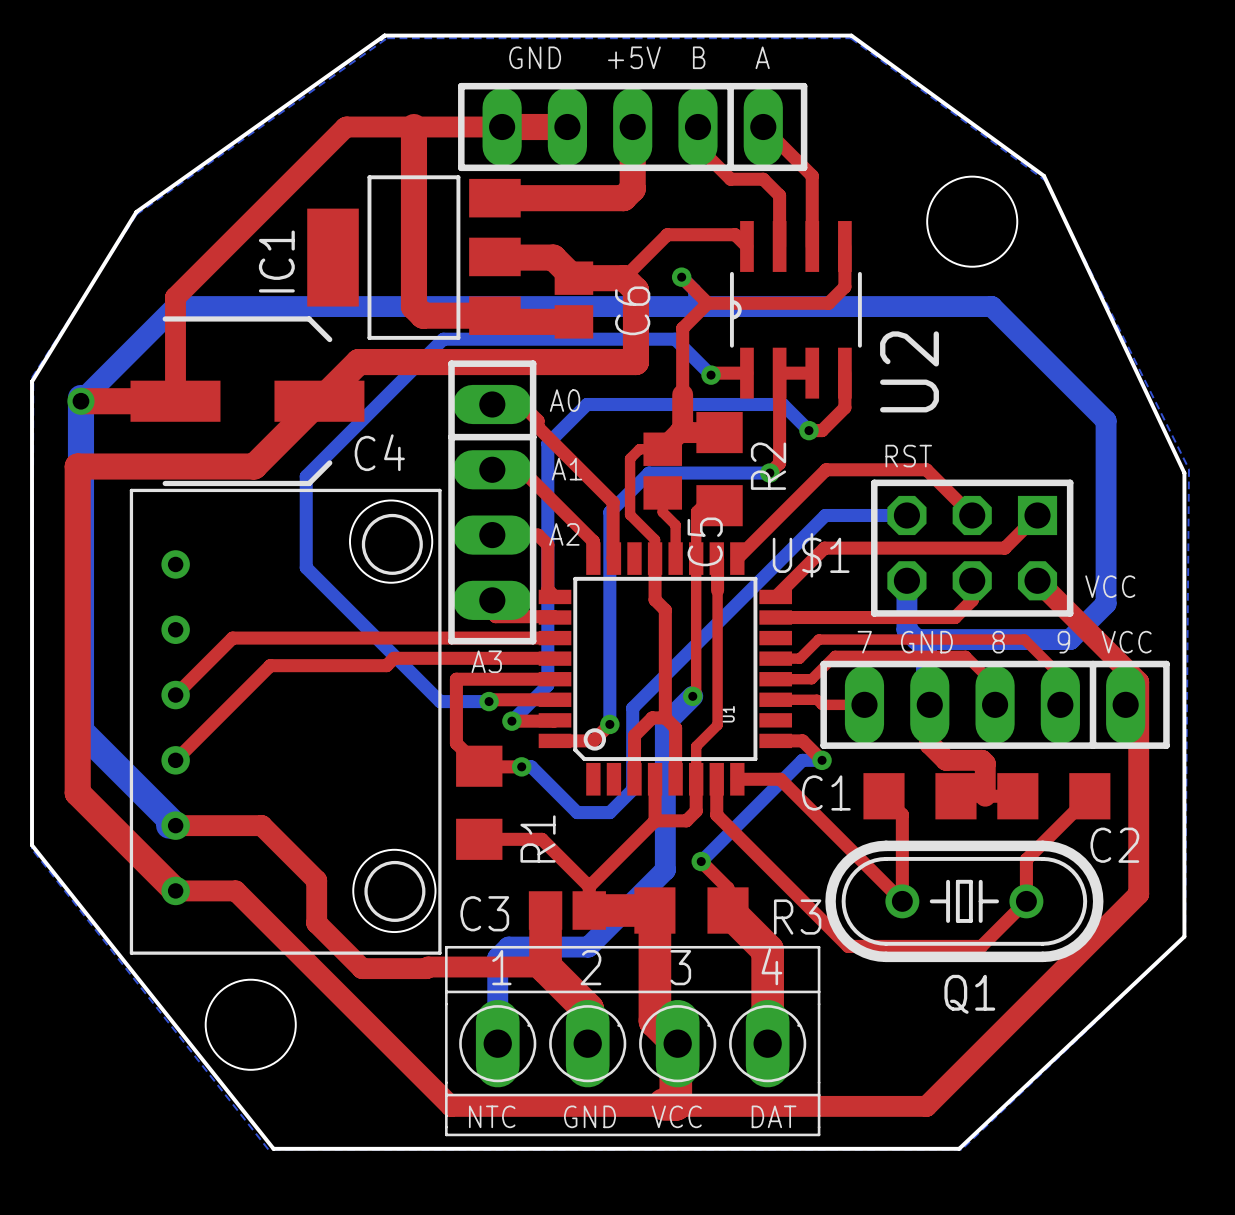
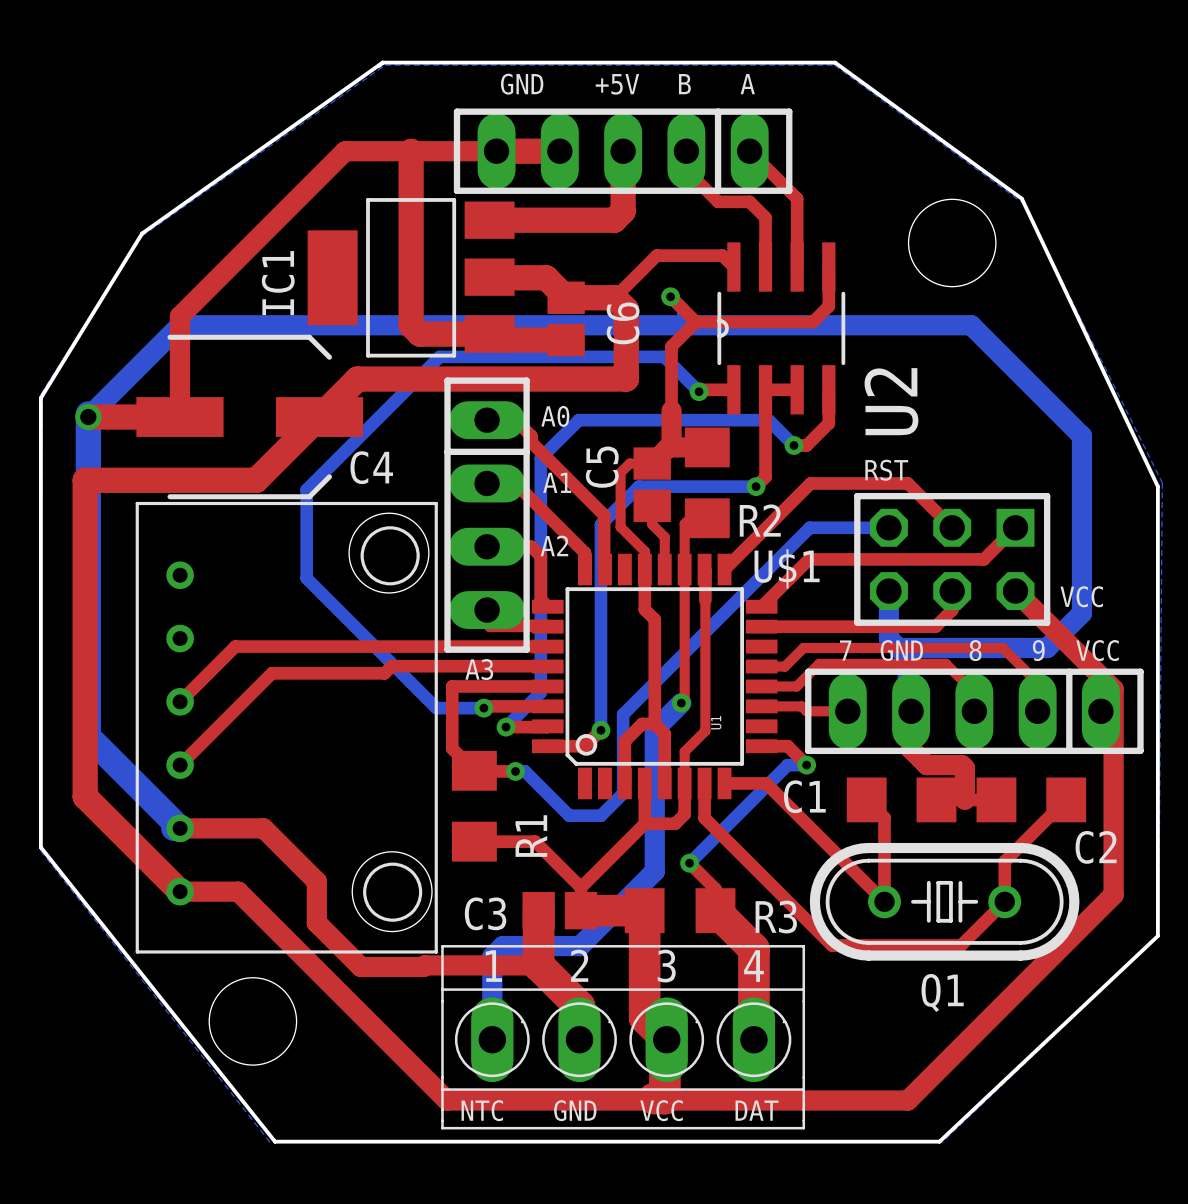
R2 name rotation: 0° (768, 466) -> 90° clockwise (760, 520)
C5 name position: C5 (705, 541) -> C5 (602, 467)

